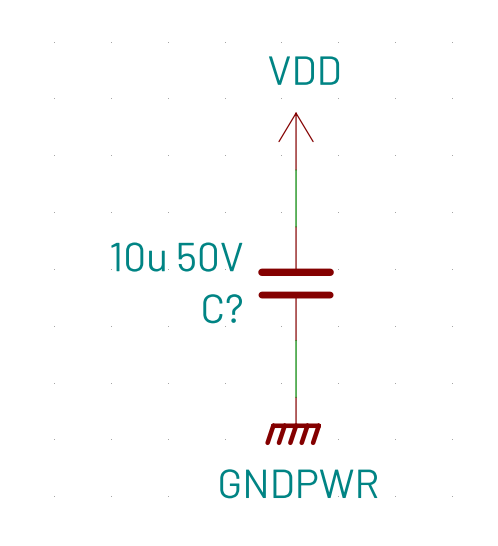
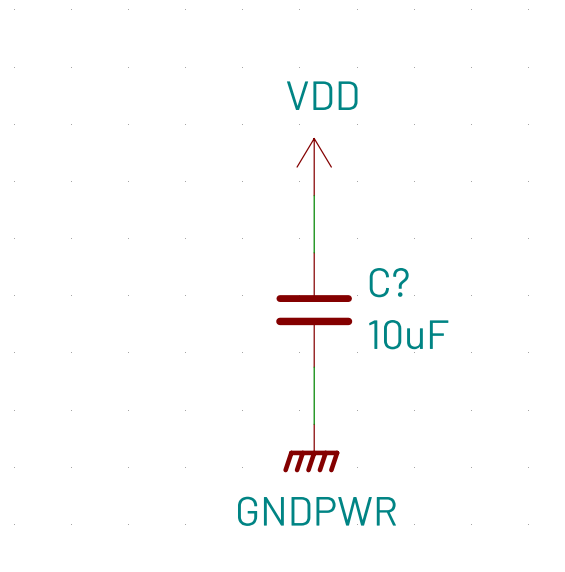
C? value: 10u 50V (176, 257) -> 10uF (408, 334)
C? rotation: 0° (296, 283) -> 180° (314, 310)

